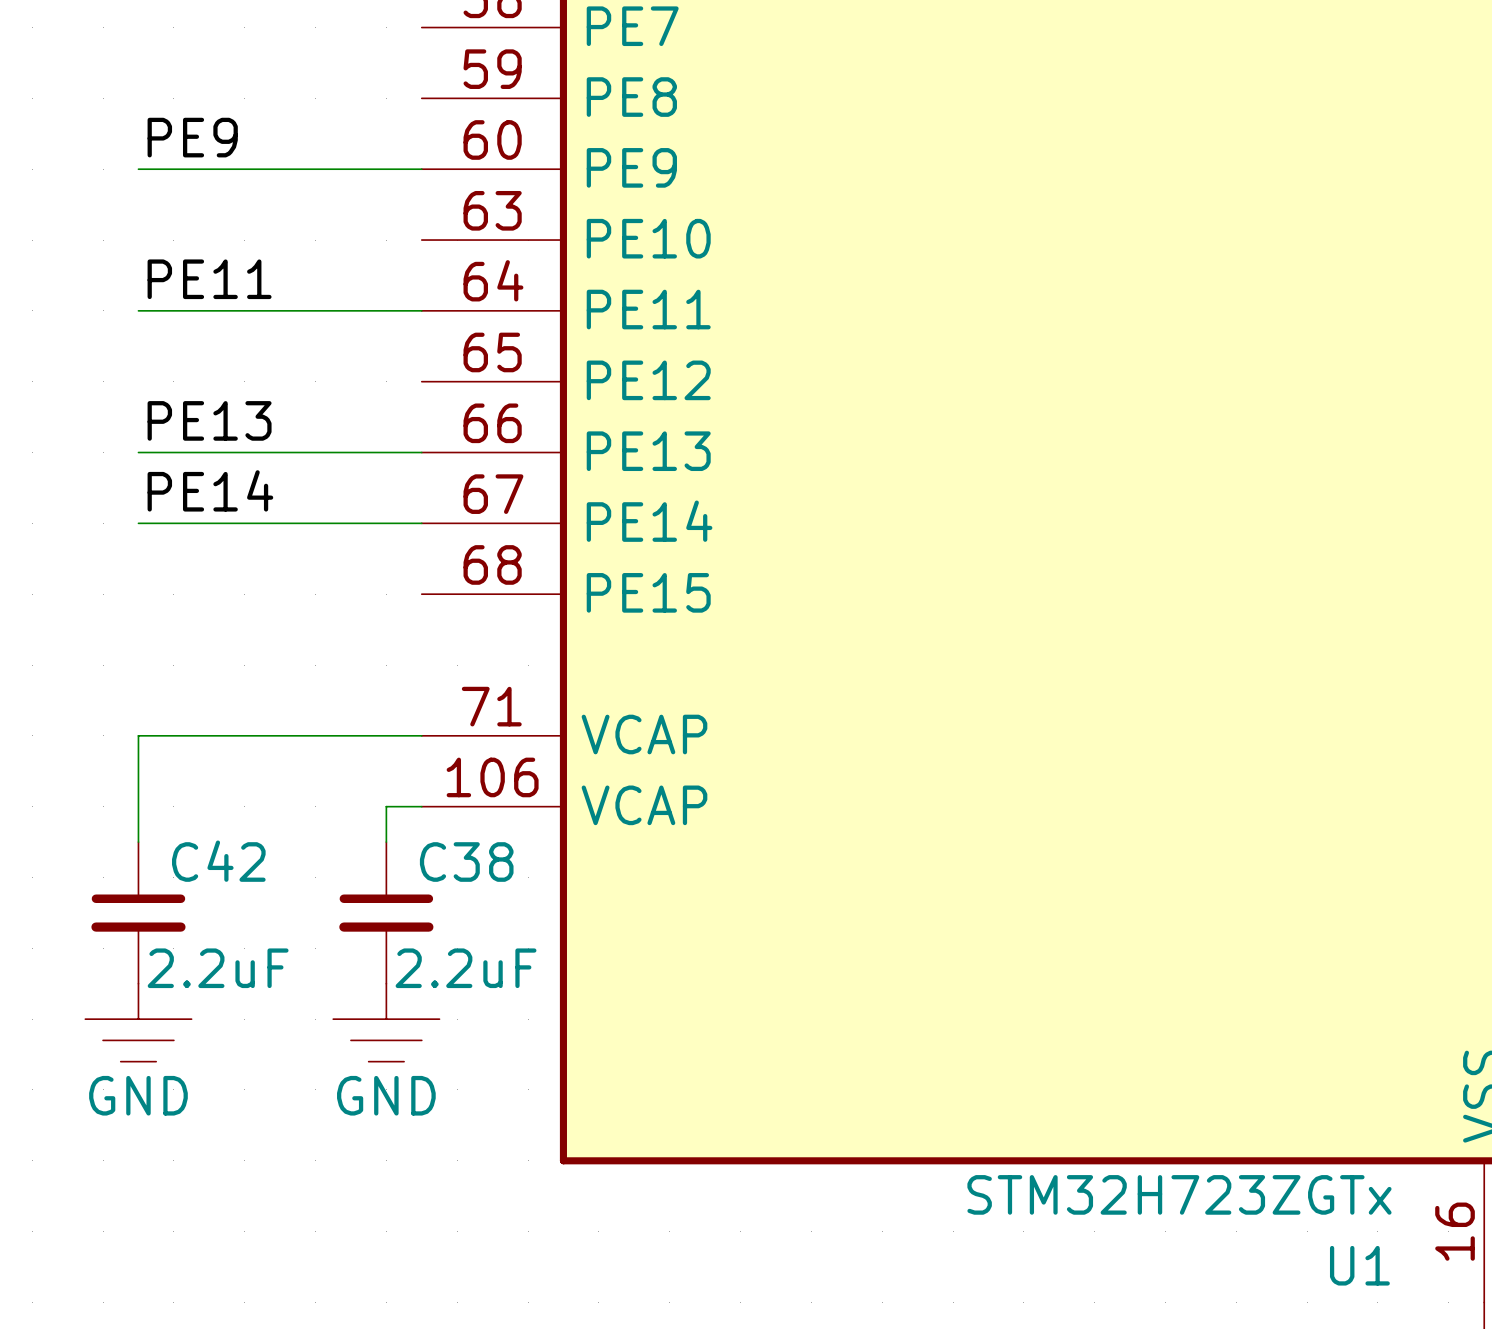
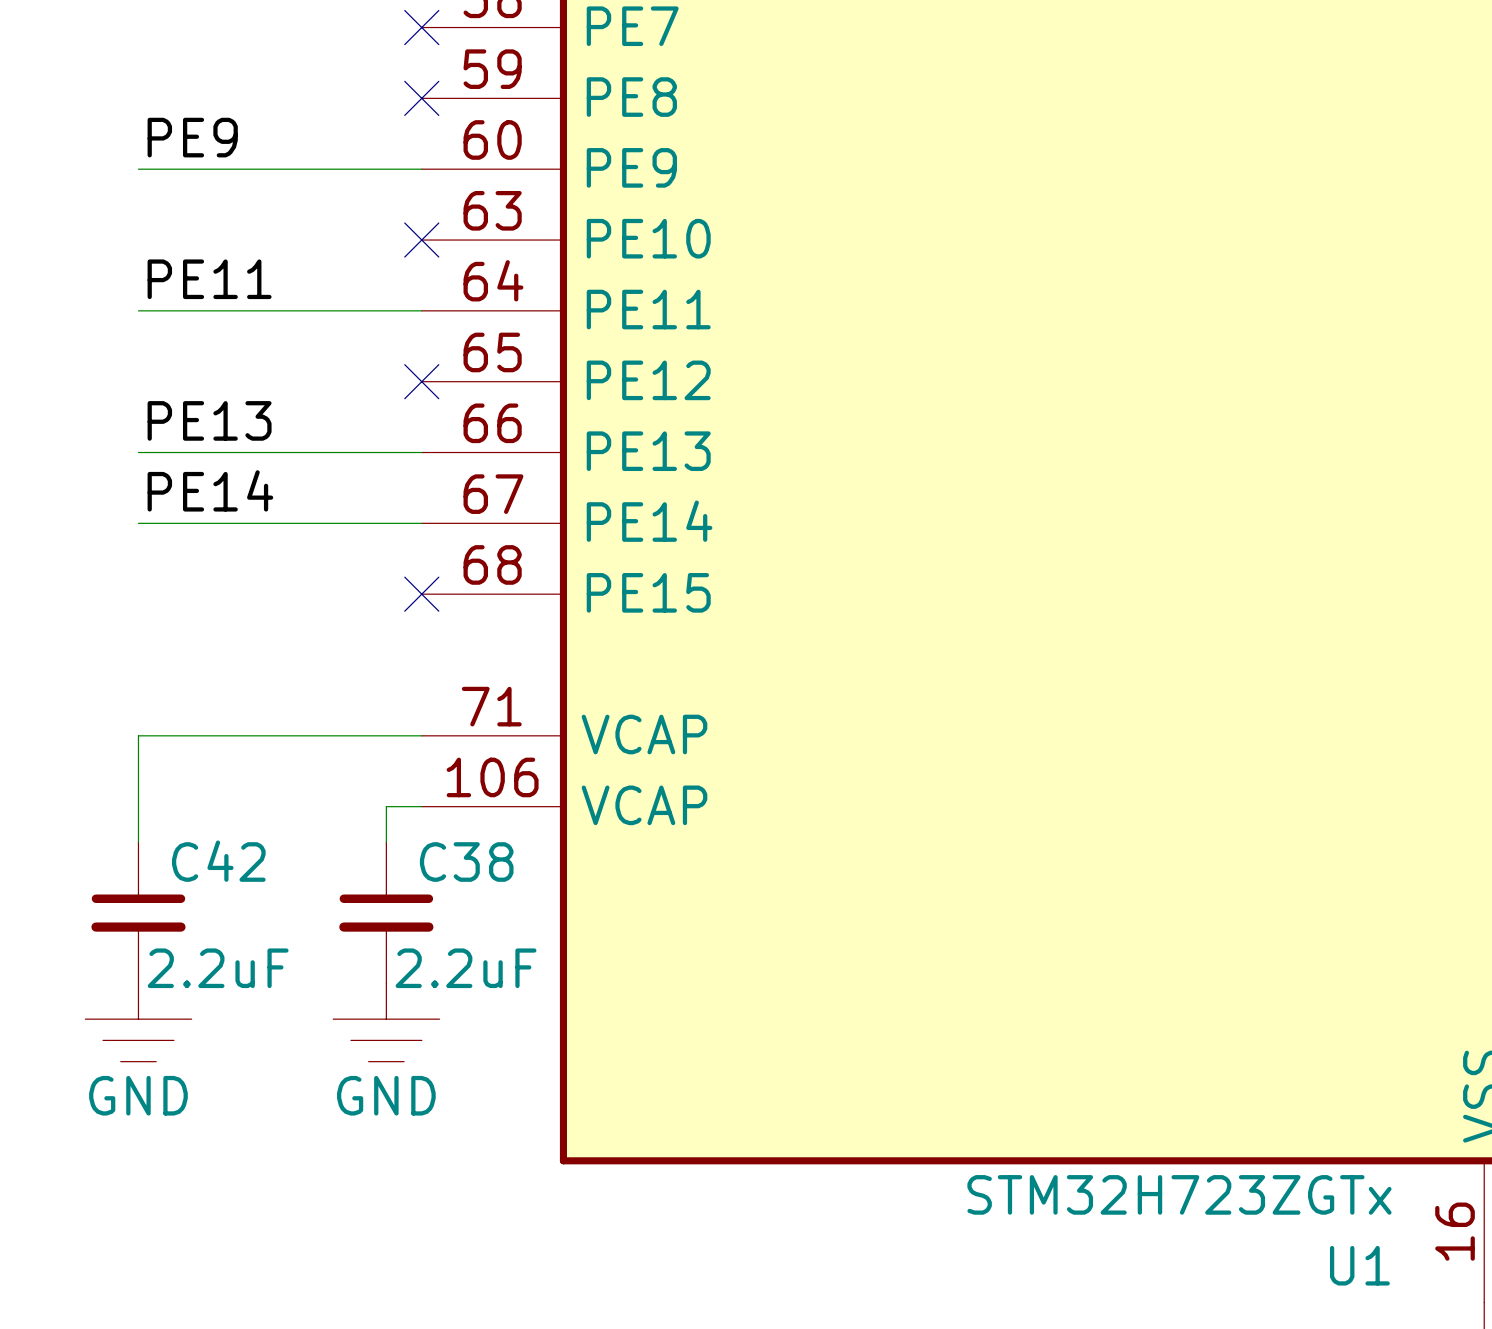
no-connect mark: none -> (421, 27)
no-connect mark: none -> (421, 98)
no-connect mark: none -> (421, 240)
no-connect mark: none -> (421, 381)
no-connect mark: none -> (421, 594)

